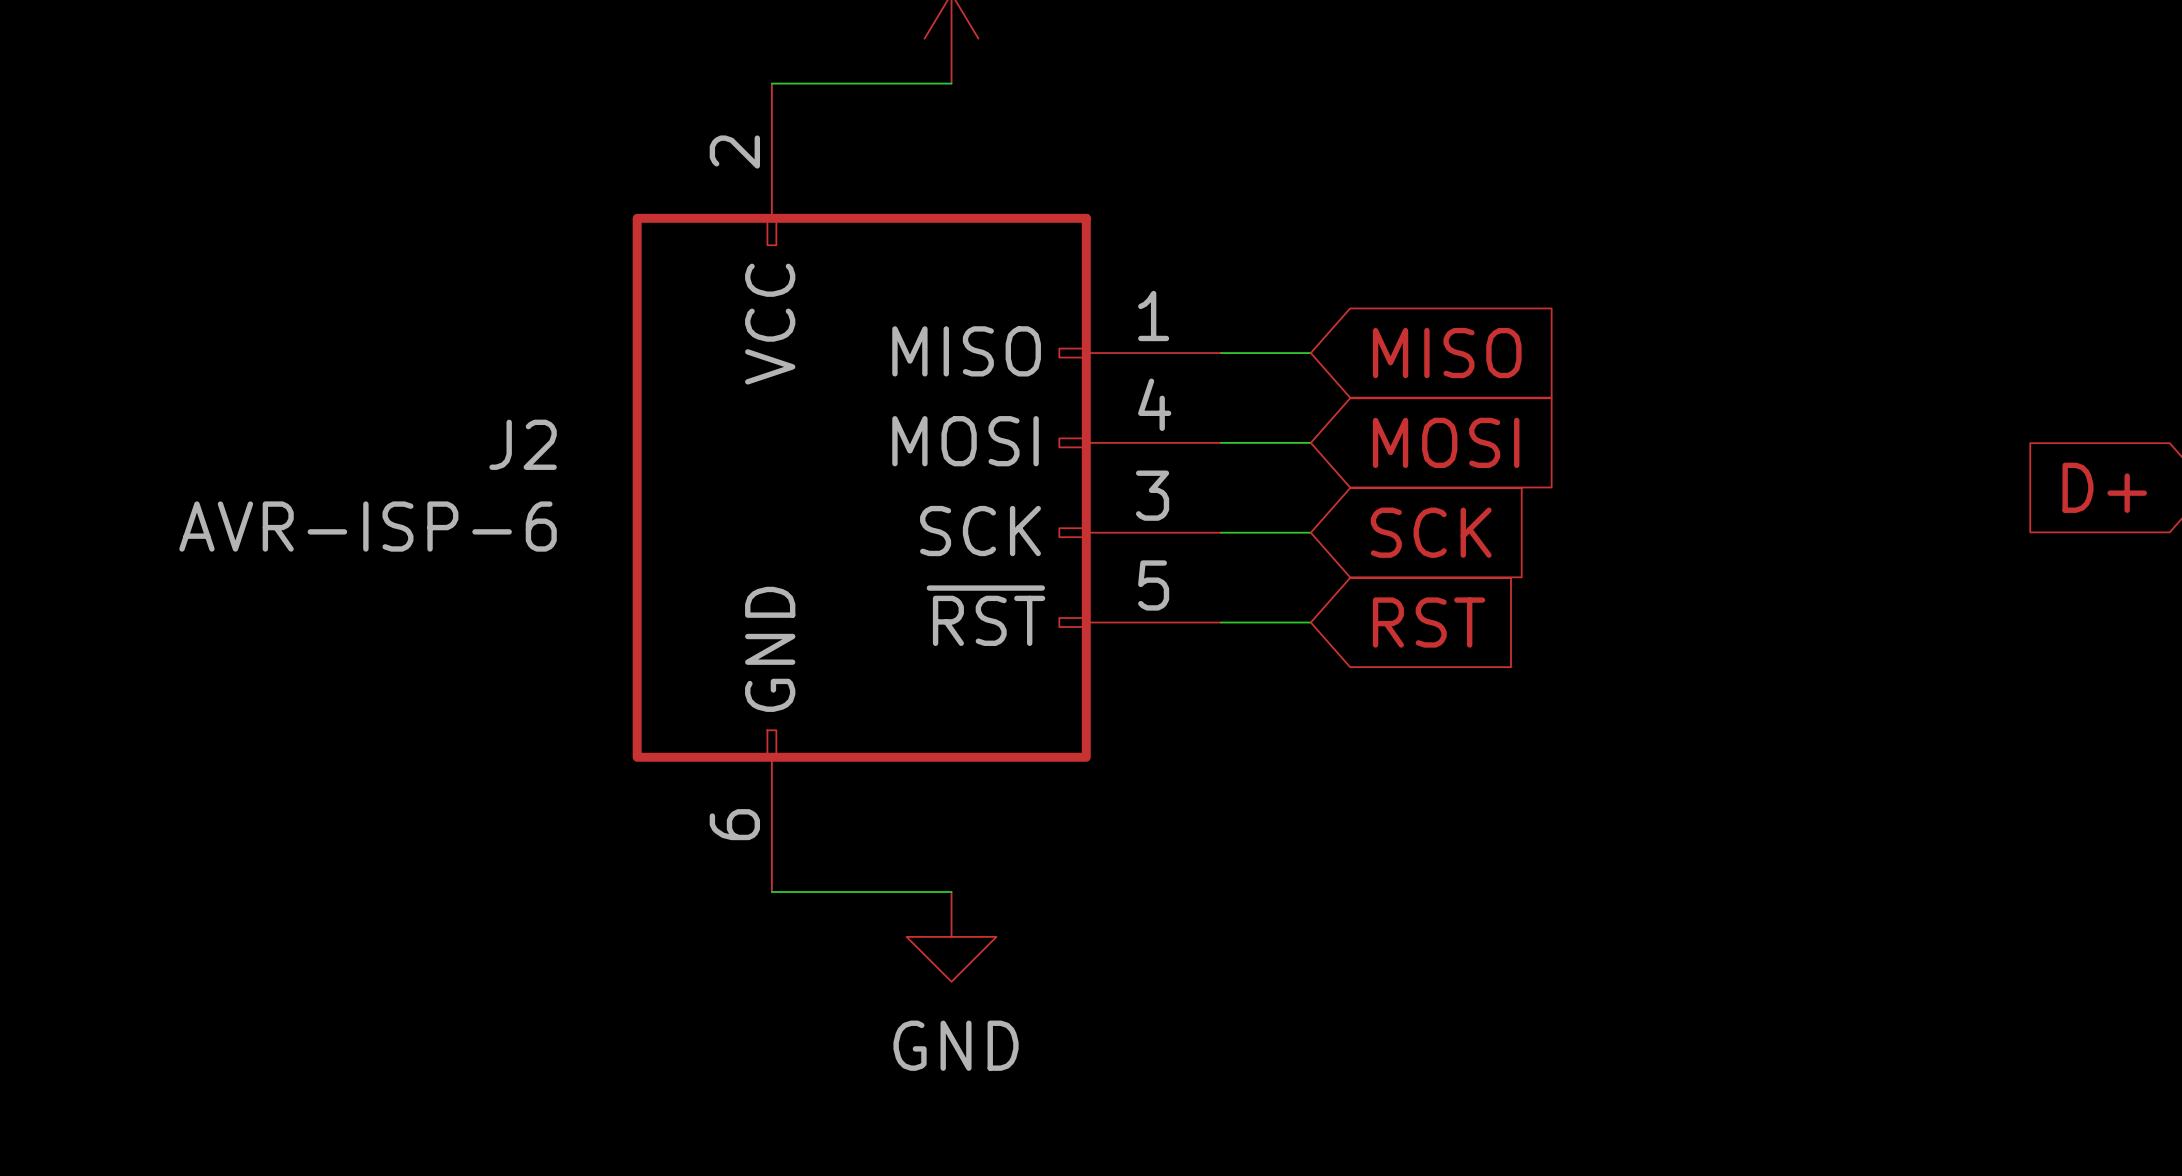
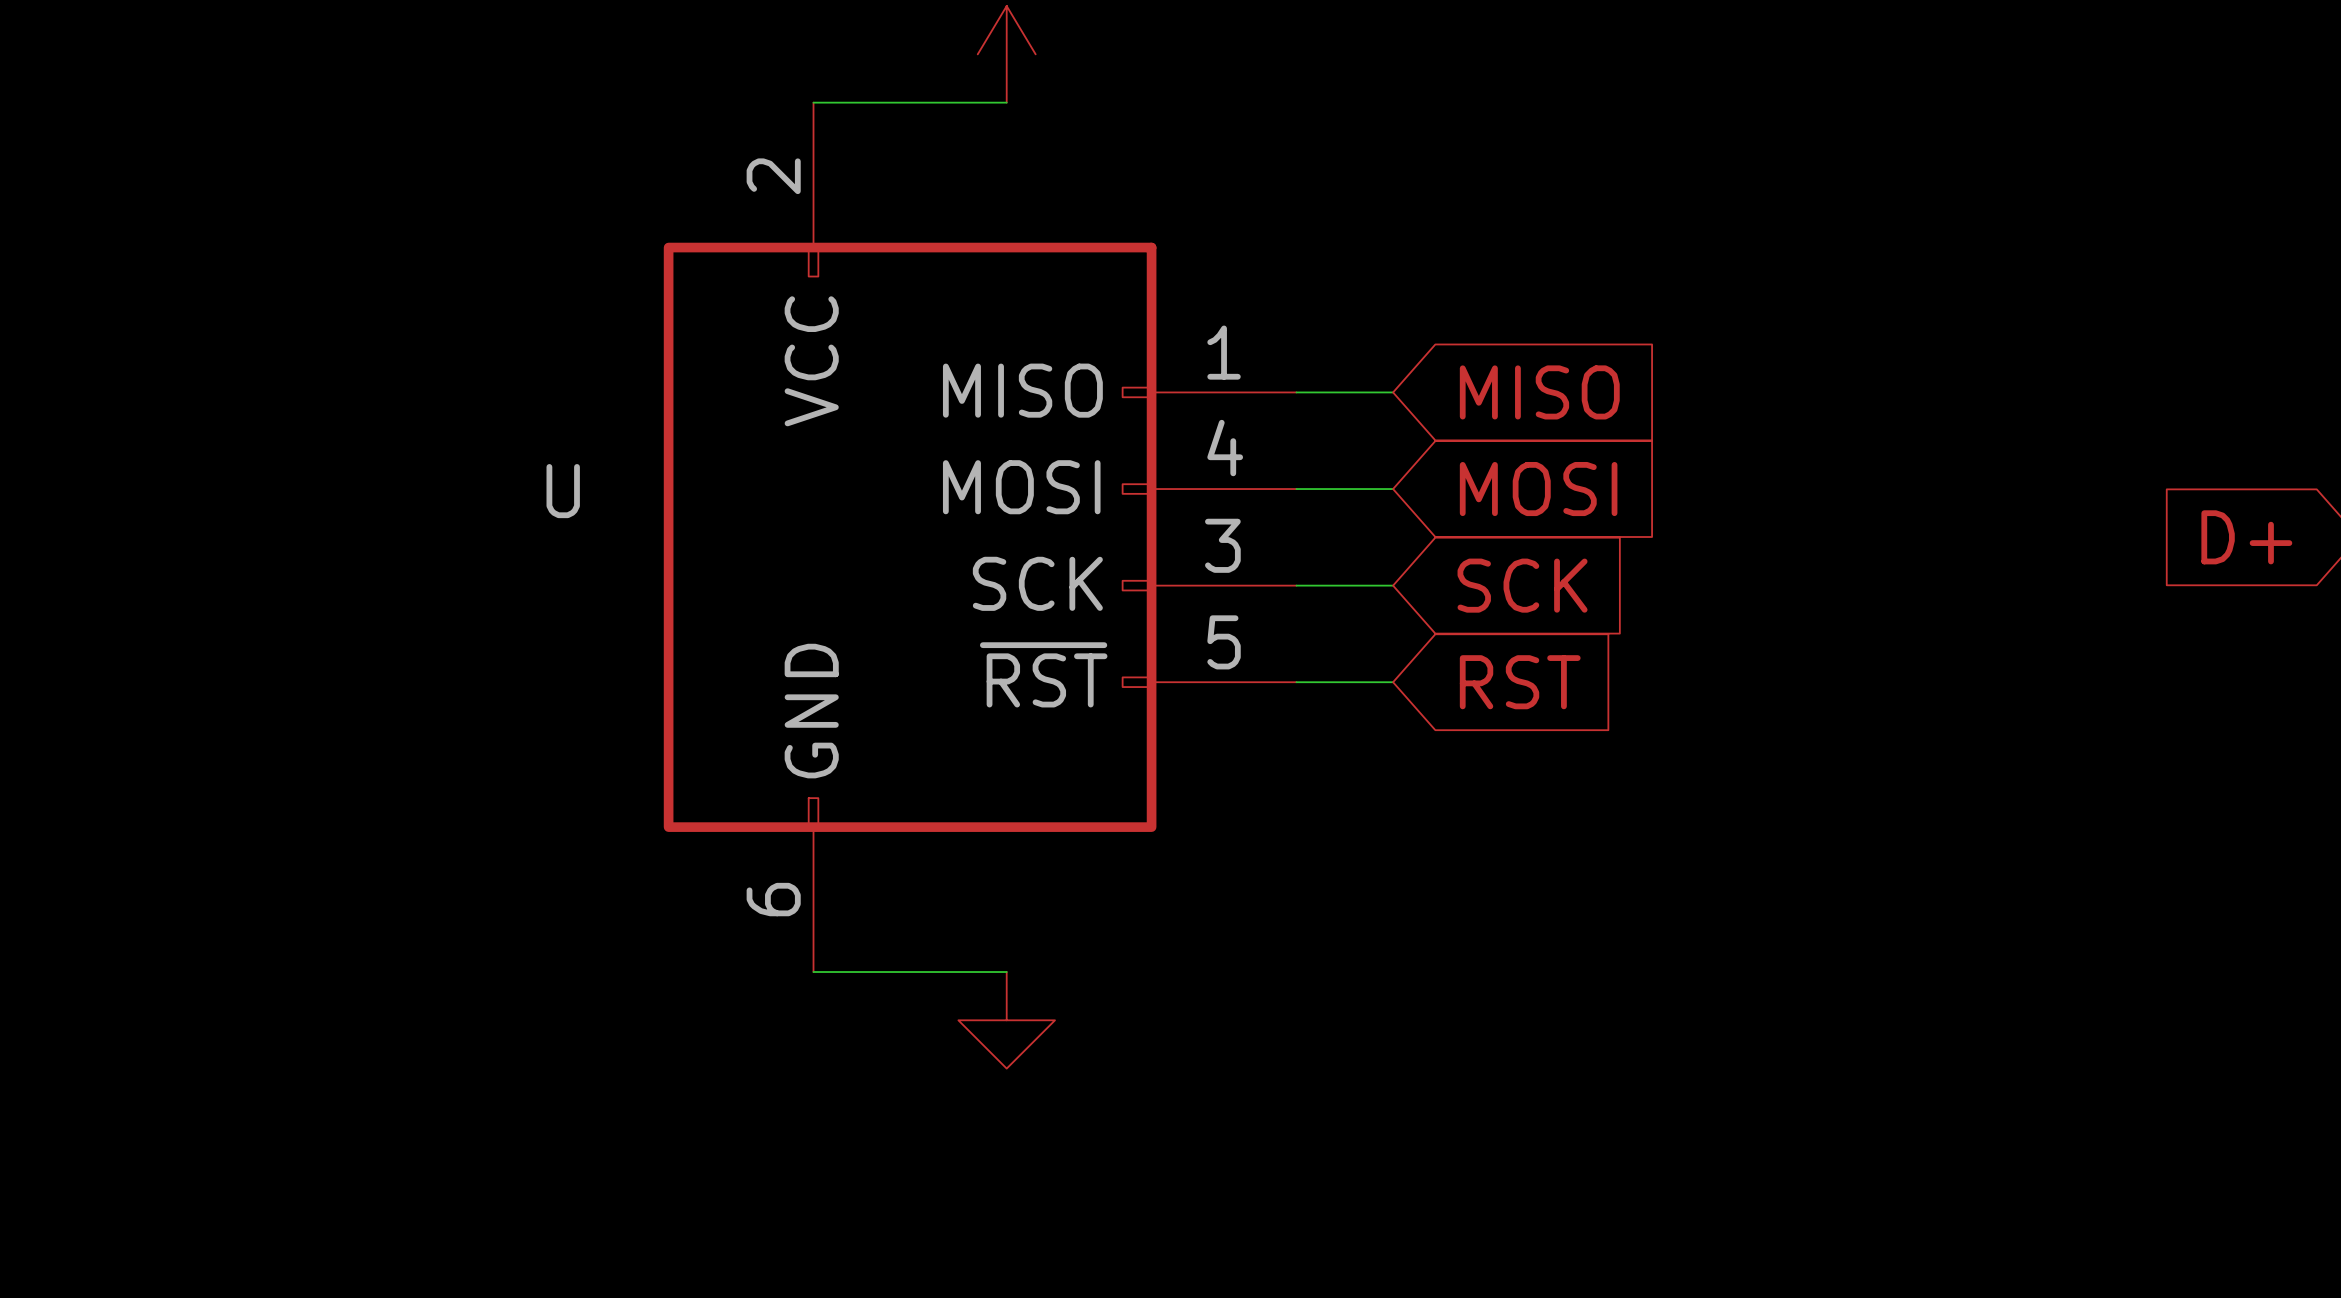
J2 name: J2 (523, 444) -> U (563, 491)
J2 value: AVR-ISP-6 (368, 526) -> none
power symbol text: GND (956, 1045) -> none

